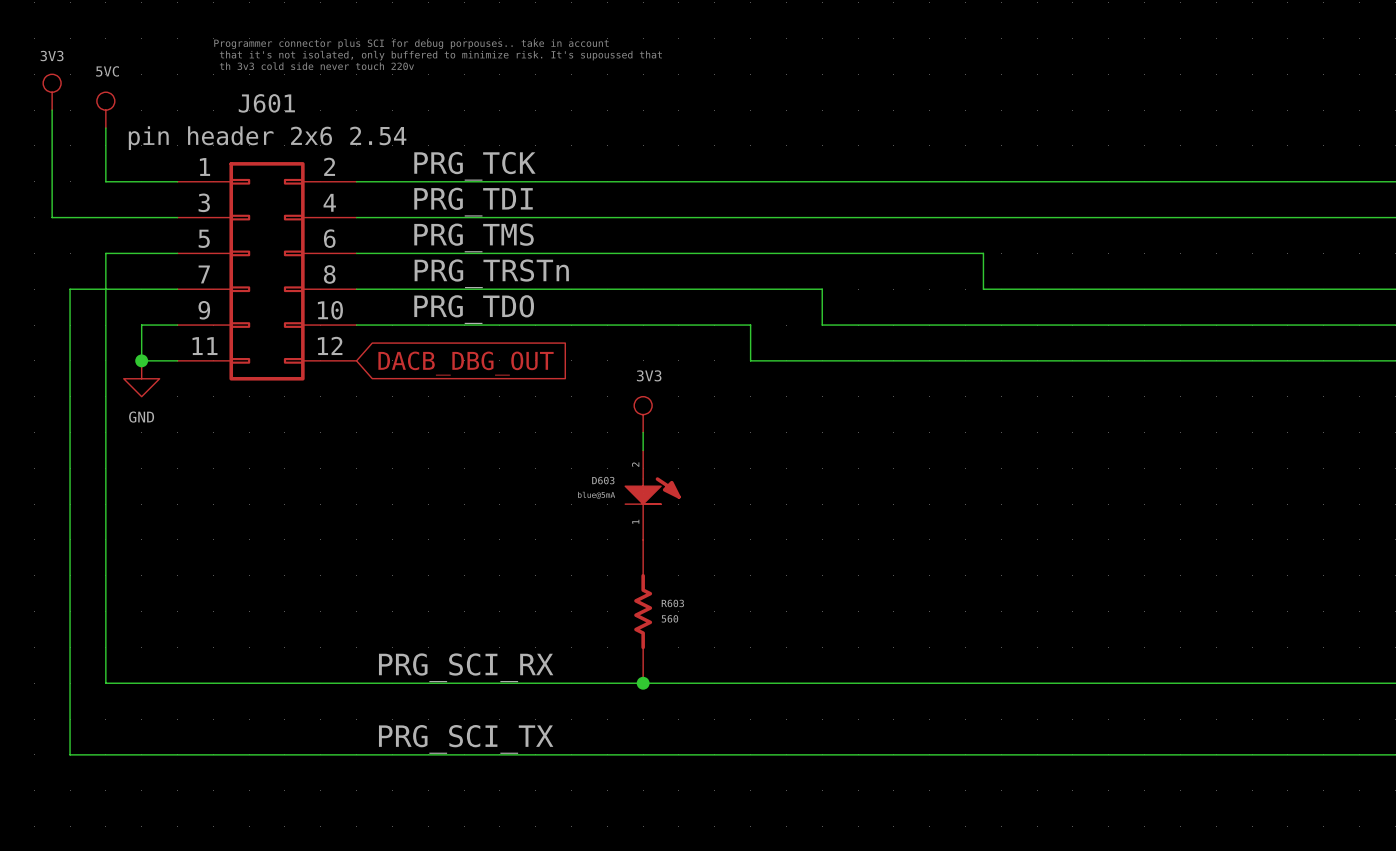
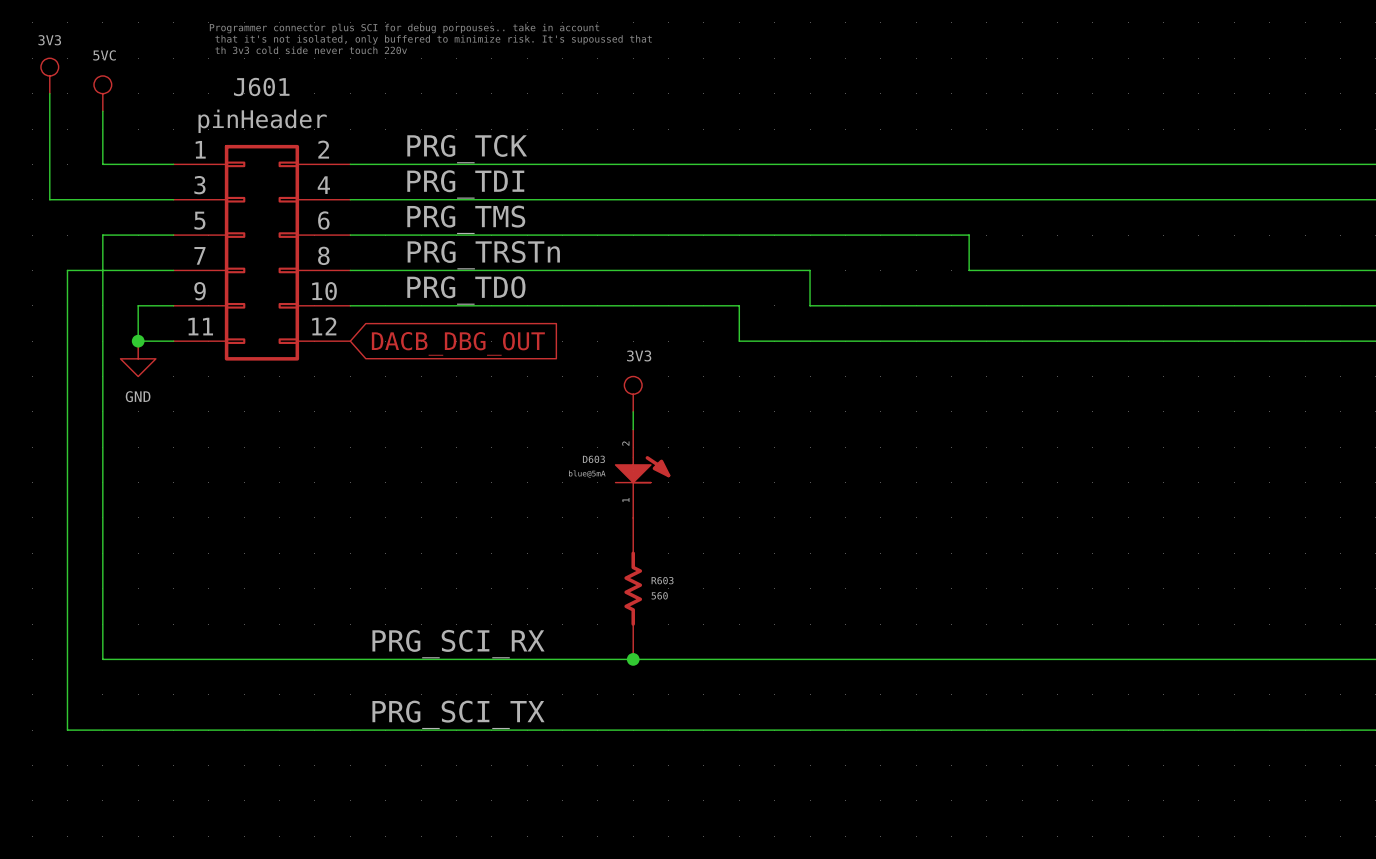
J601 value: pin header 2x6 2.54 (267, 138) -> pinHeader (262, 121)

